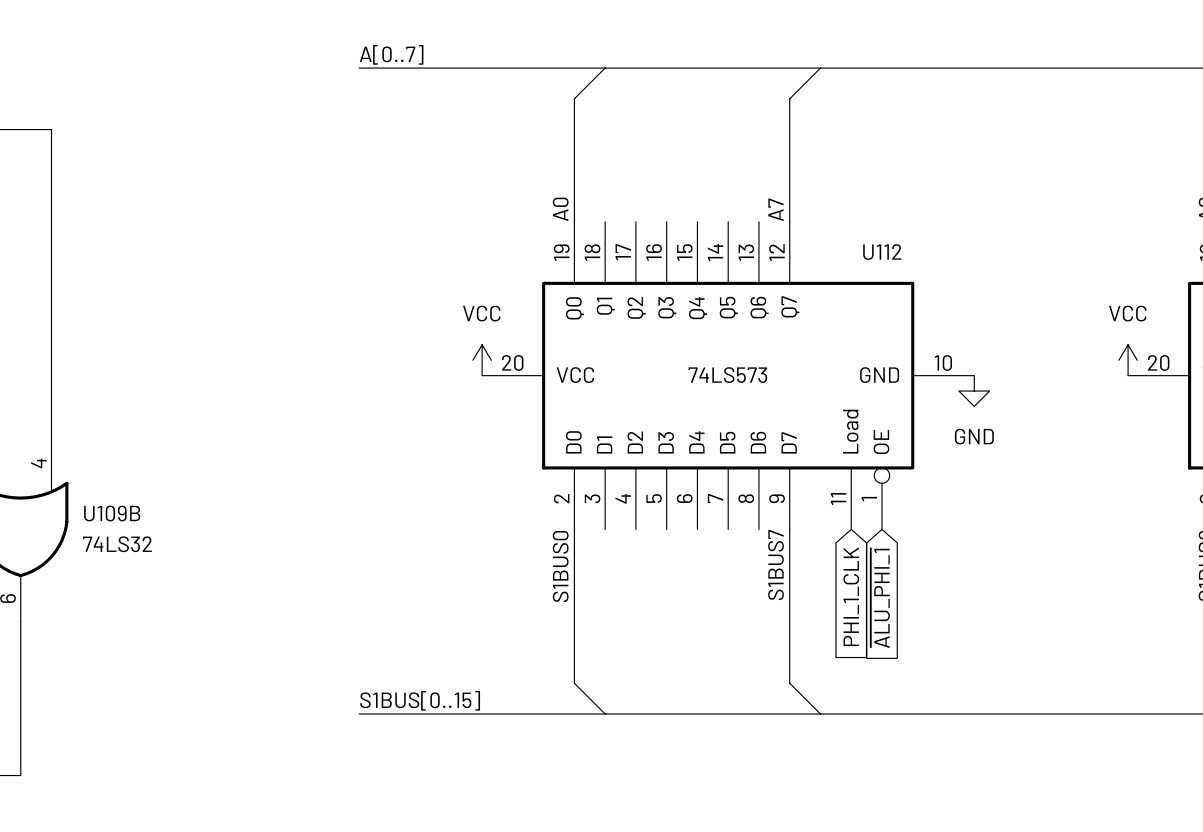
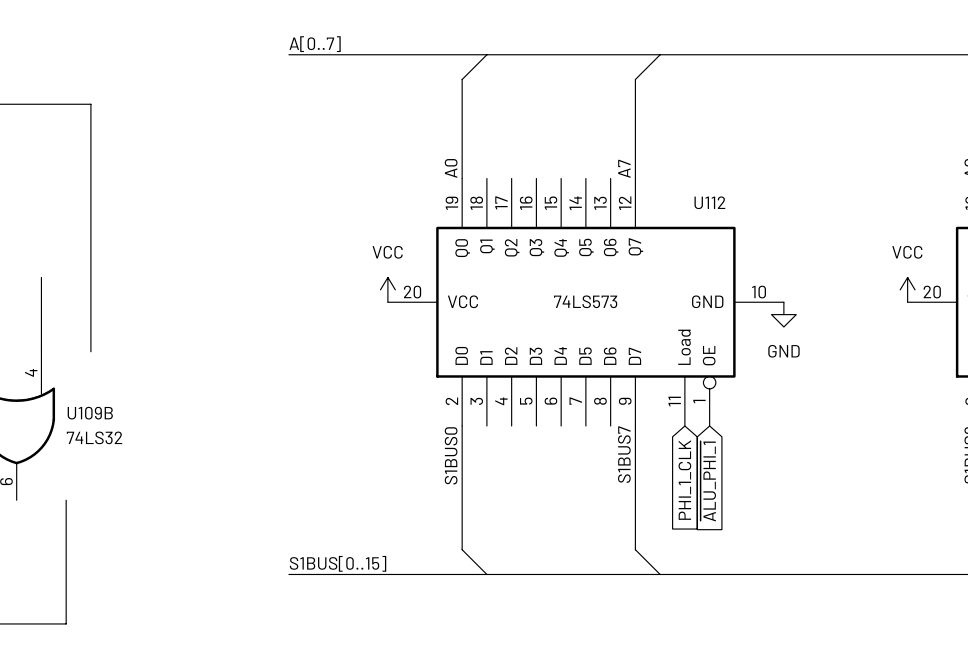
wire: (51, 129) (51, 344) -> (41, 104) (90, 104) (90, 351)
wire: (20, 621) (20, 775) -> (66, 500) (66, 623) (16, 623)

